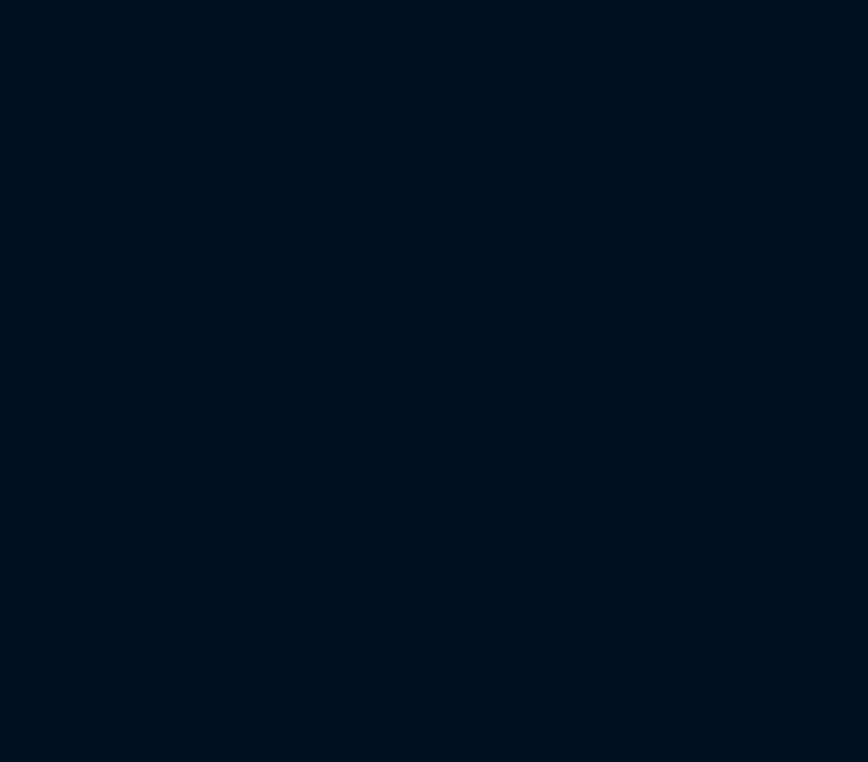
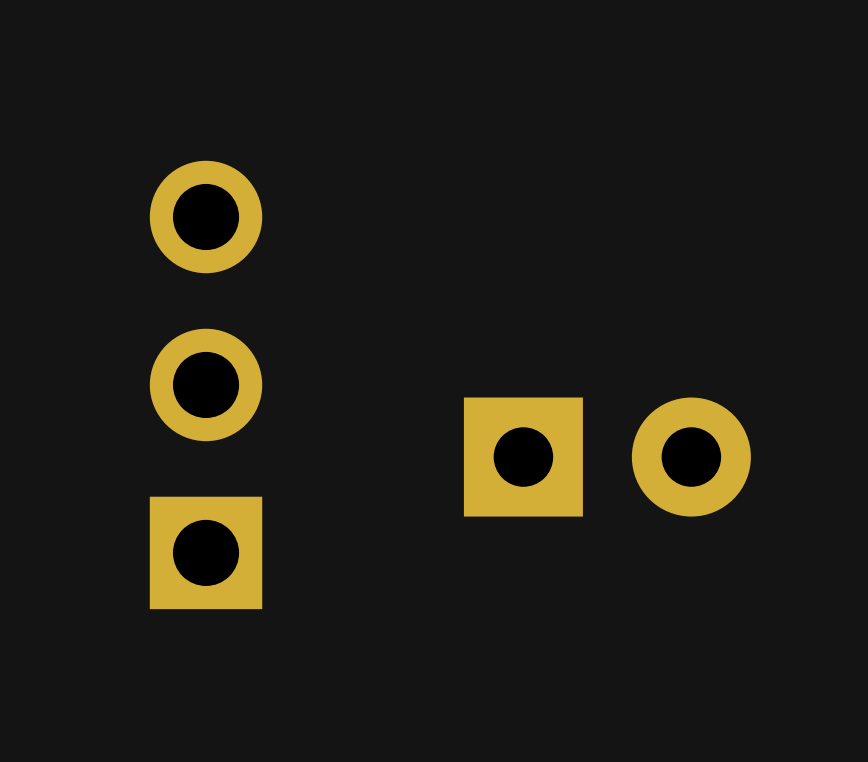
part: none -> (206, 384)
part: none -> (607, 457)

